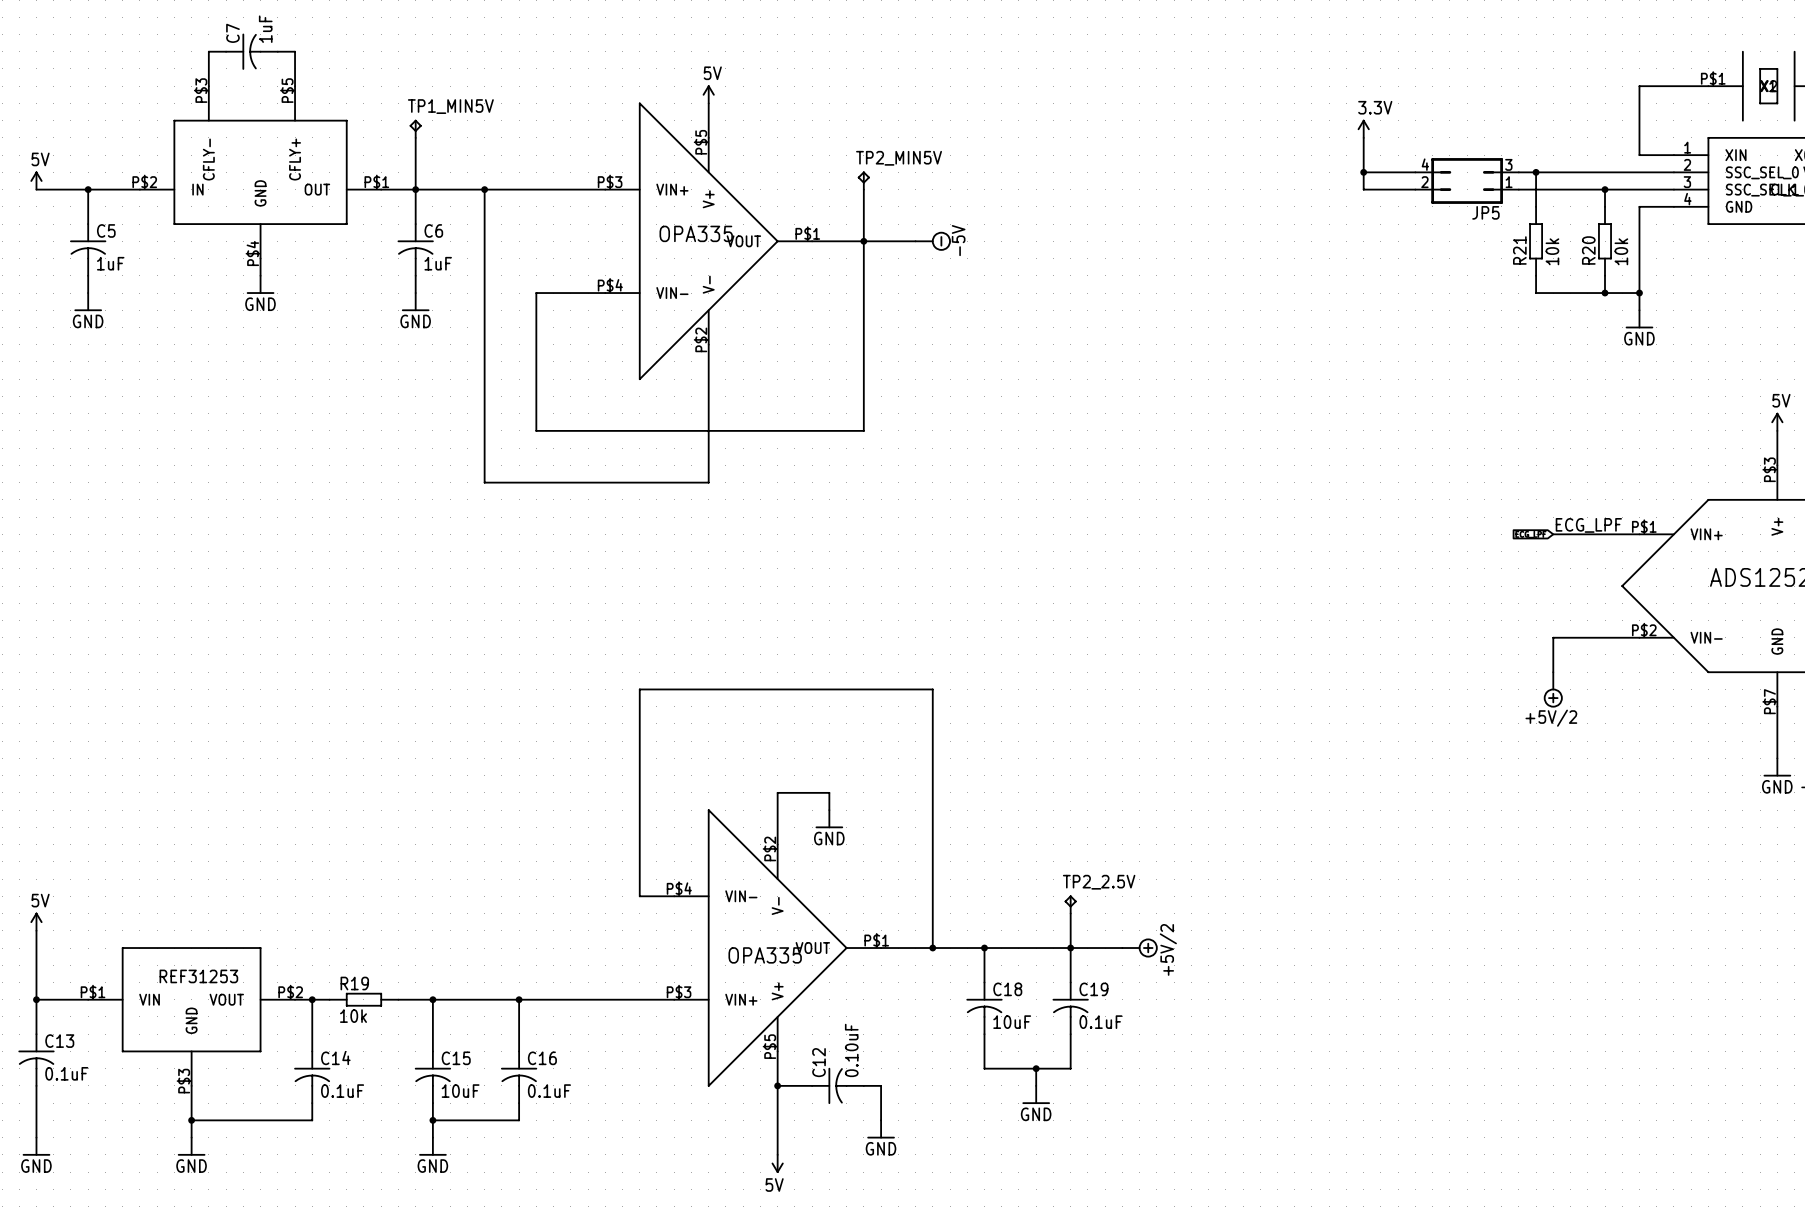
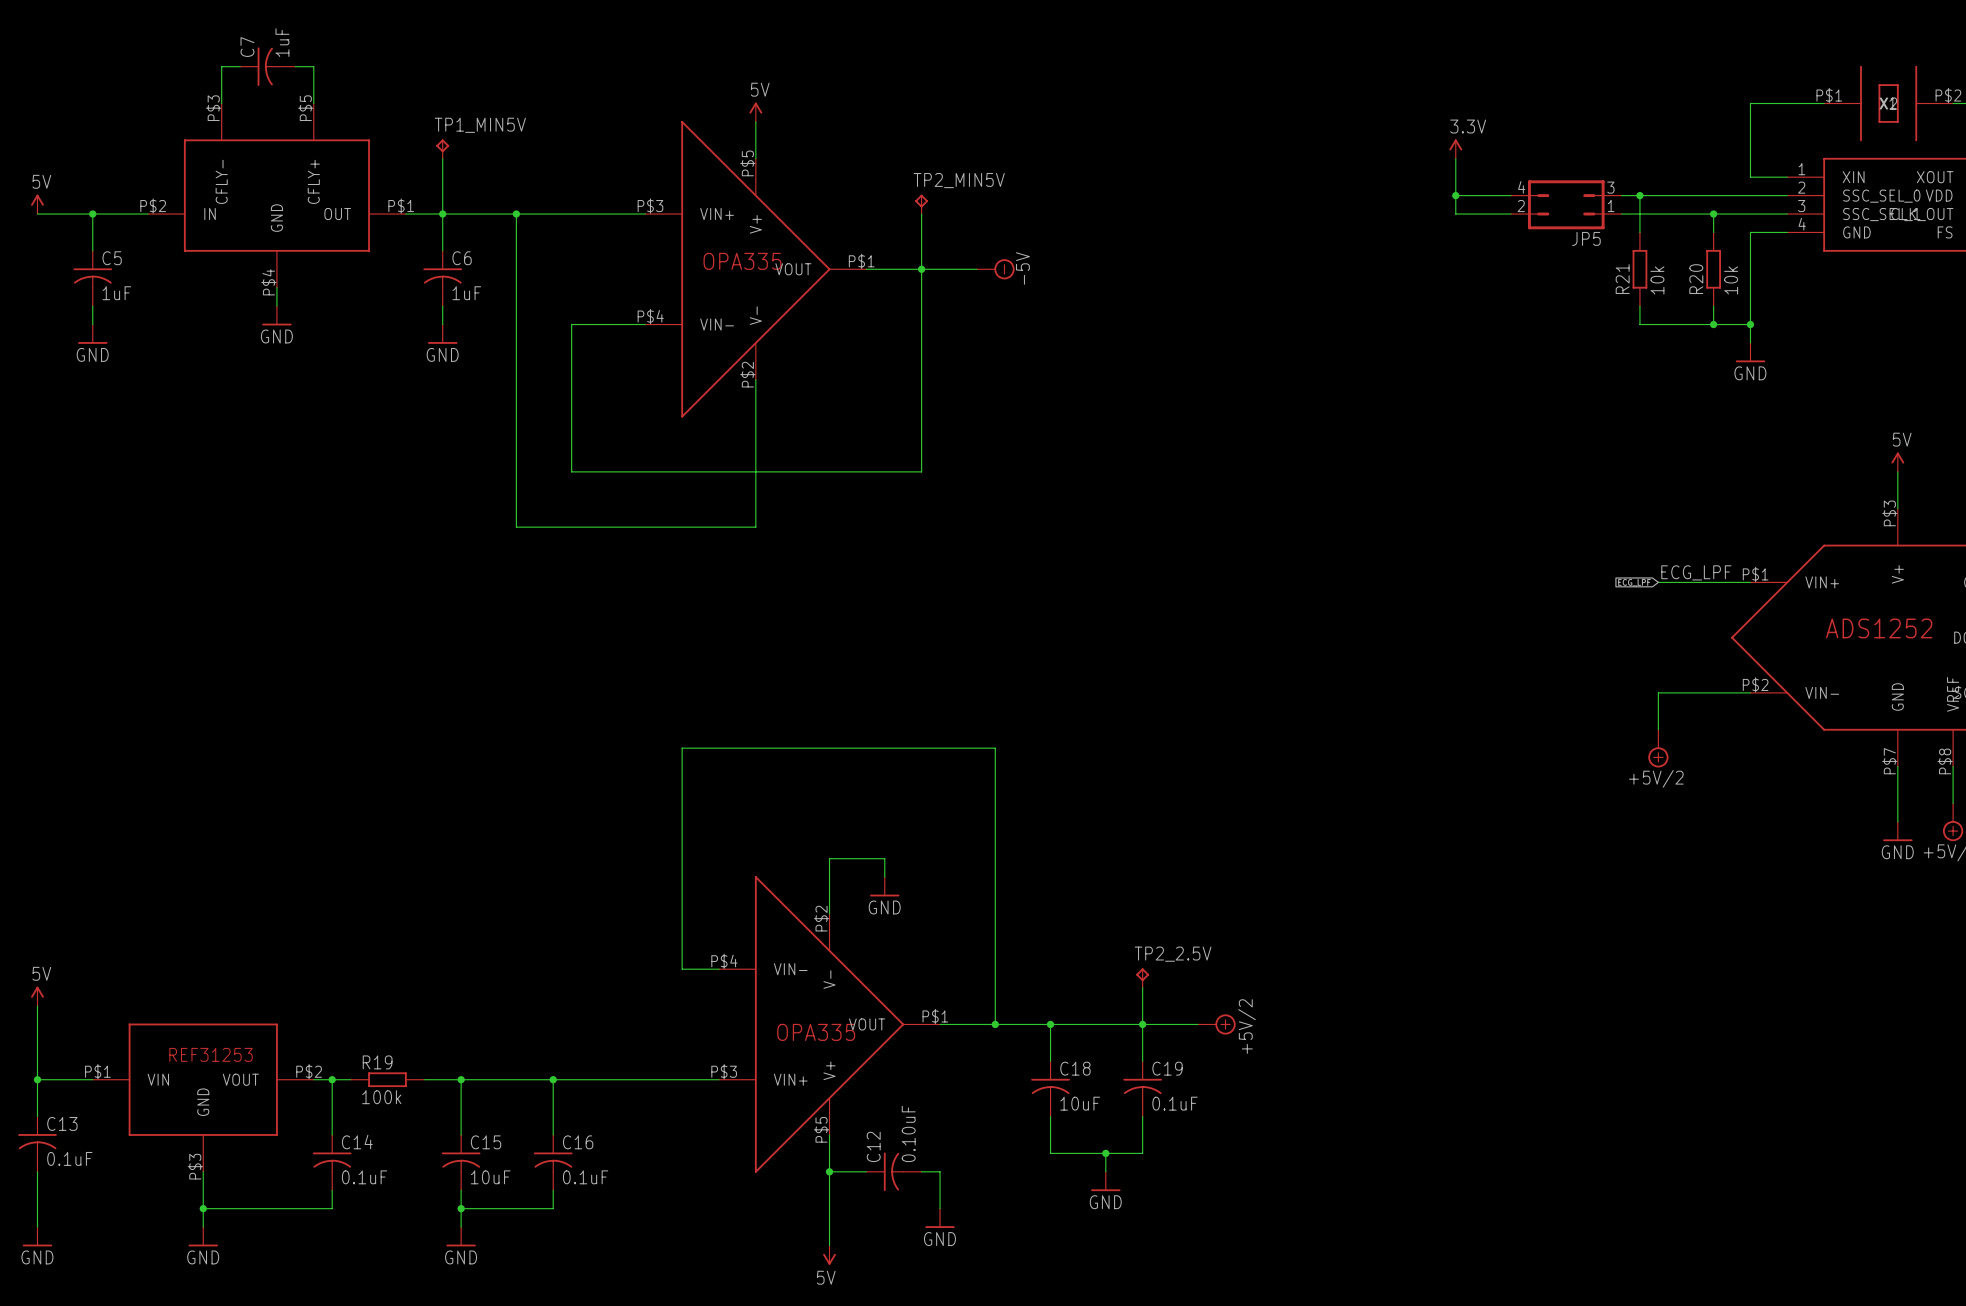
R19 value: 10k (353, 1016) -> 100k (381, 1097)

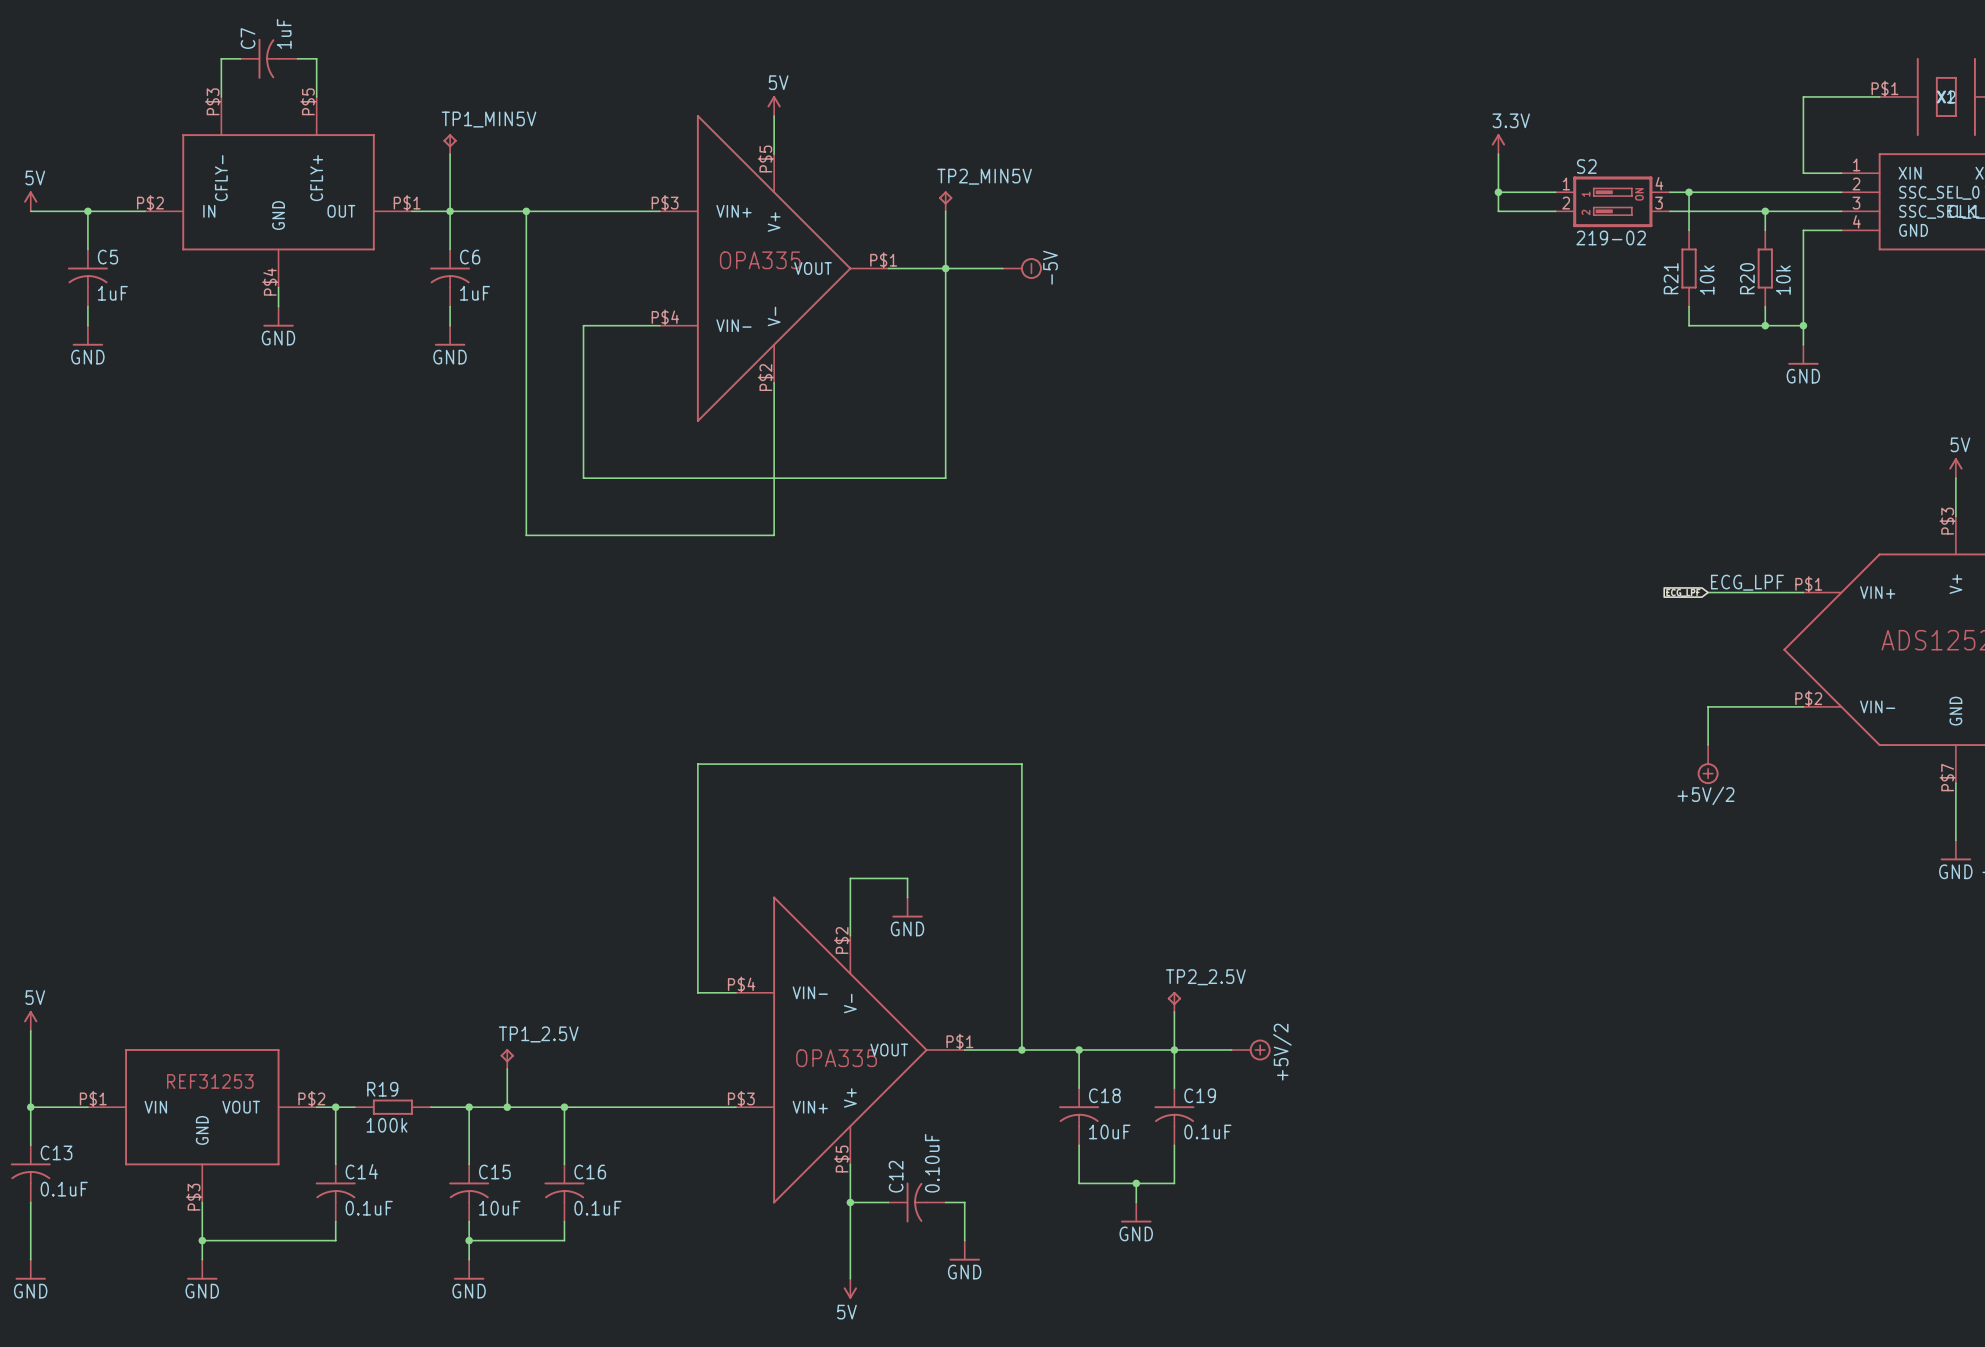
JP5: (1566, 204) -> none
S2: none -> 219-02 (1612, 201)
TP1_2.5V: none -> (507, 1059)
wire: none -> (507, 1069) (507, 1107)
junction: none -> (507, 1107)

